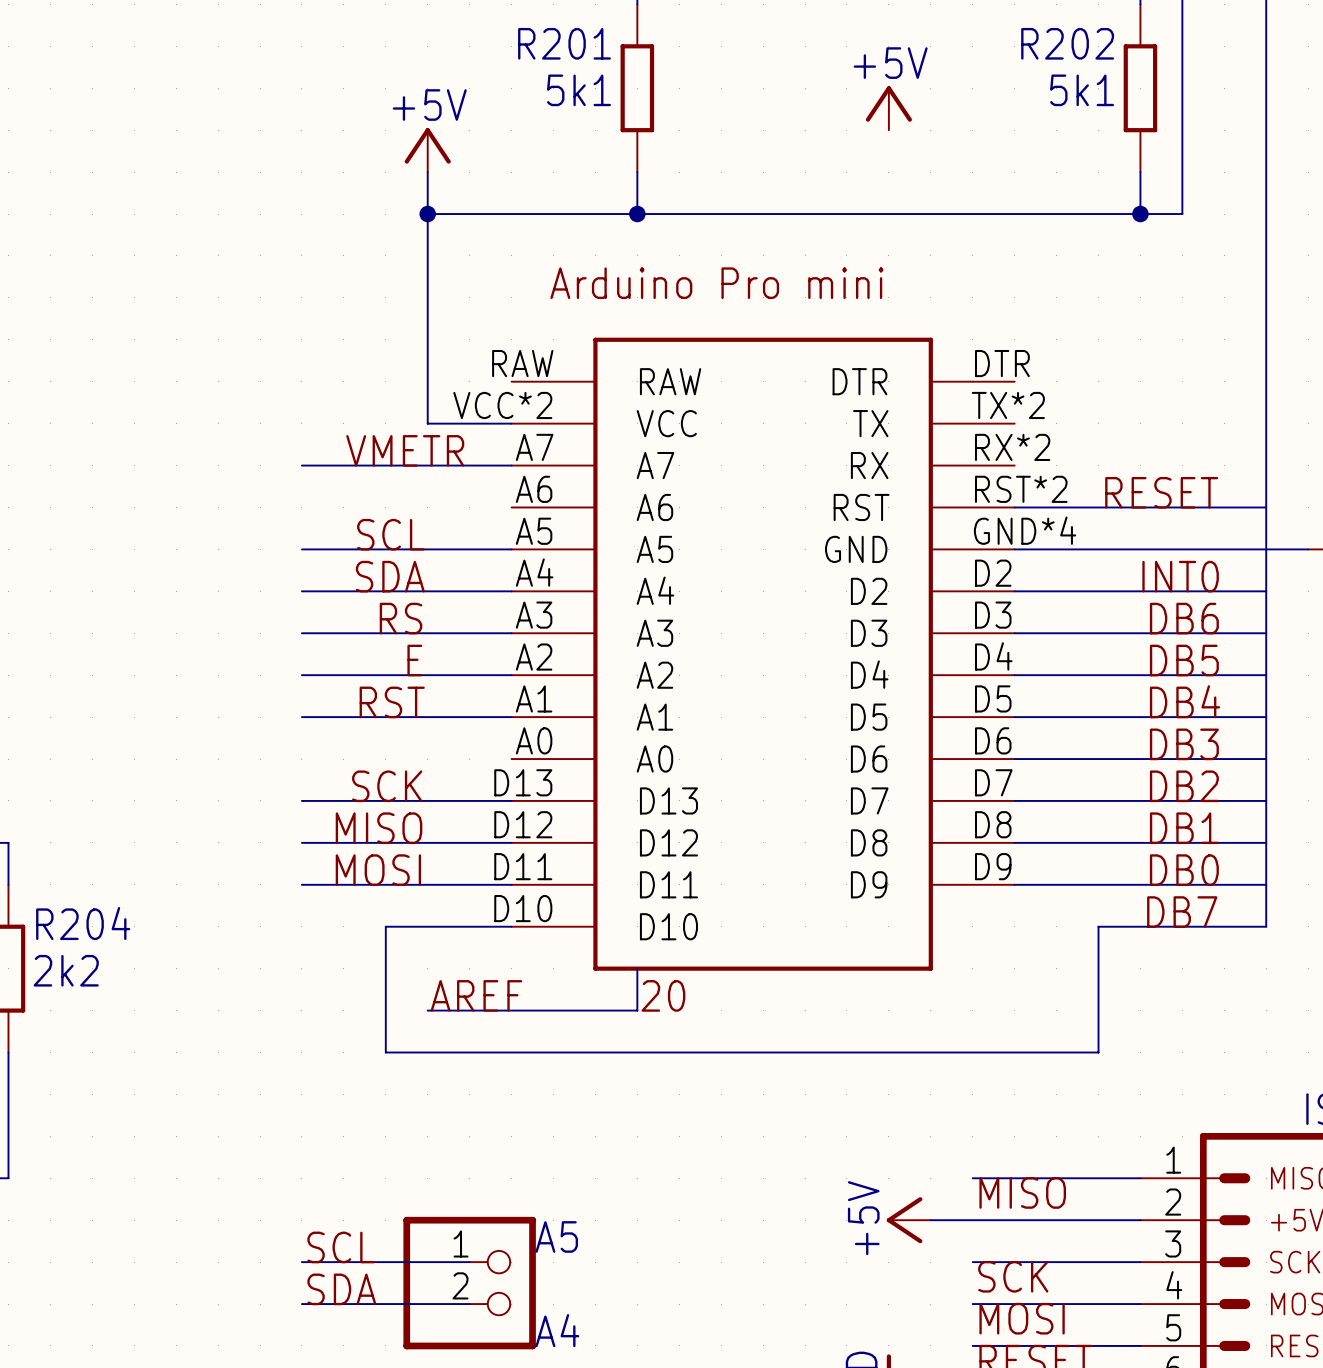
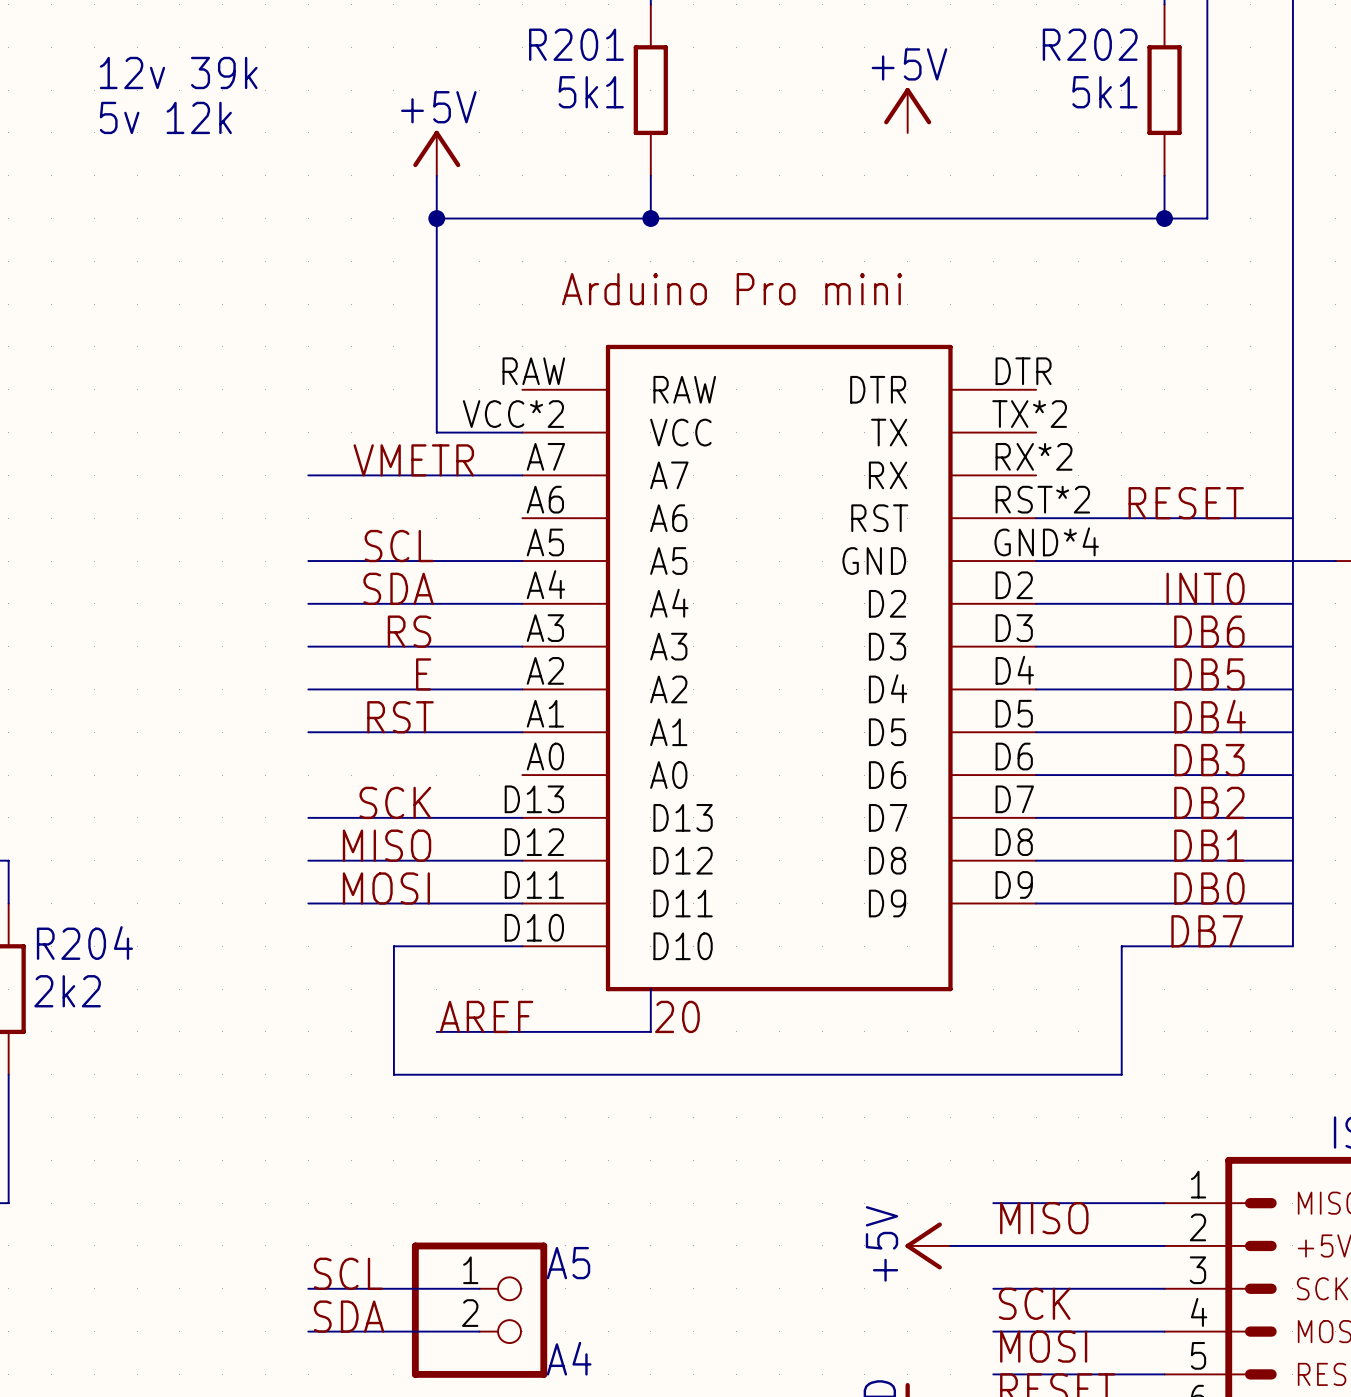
text: none -> 12v 39k (178, 72)
text: none -> 5v 12k (165, 117)

